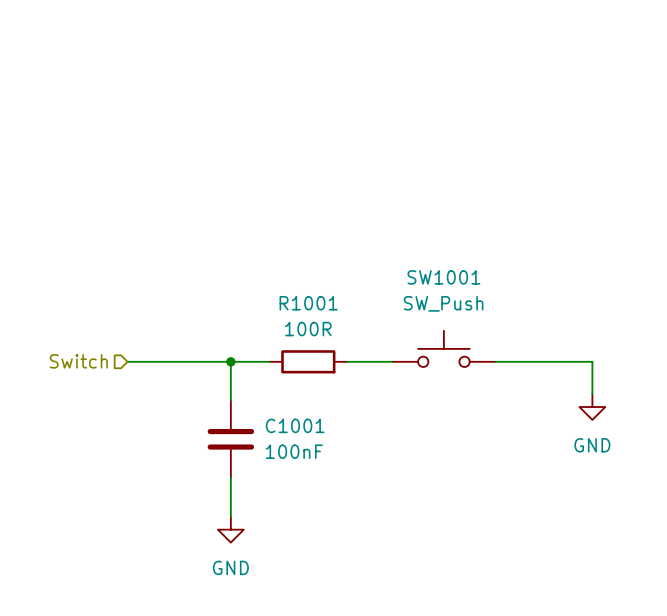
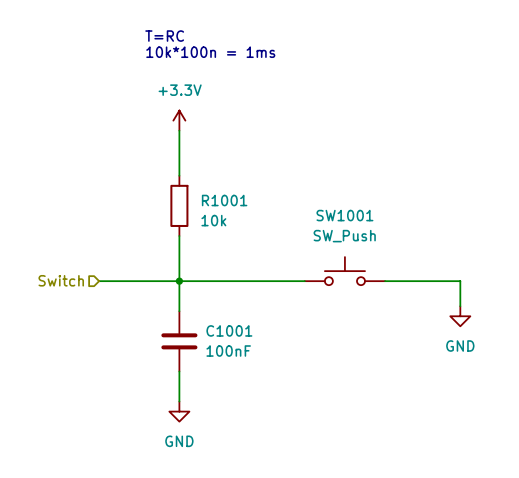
text: none -> T=RC (164, 36)
text: none -> 10k*100n = 1ms (210, 52)
power symbol: none -> +3.3V (179, 120)
wire: none -> (179, 130) (179, 175)
wire: none -> (179, 236) (179, 281)
R1001 value: 100R (308, 329) -> 10k (213, 220)
wire: none -> (209, 281) (269, 281)
R1001 rotation: 0° (308, 361) -> 90° clockwise (179, 205)
R1001 position: (308, 361) -> (179, 205)

